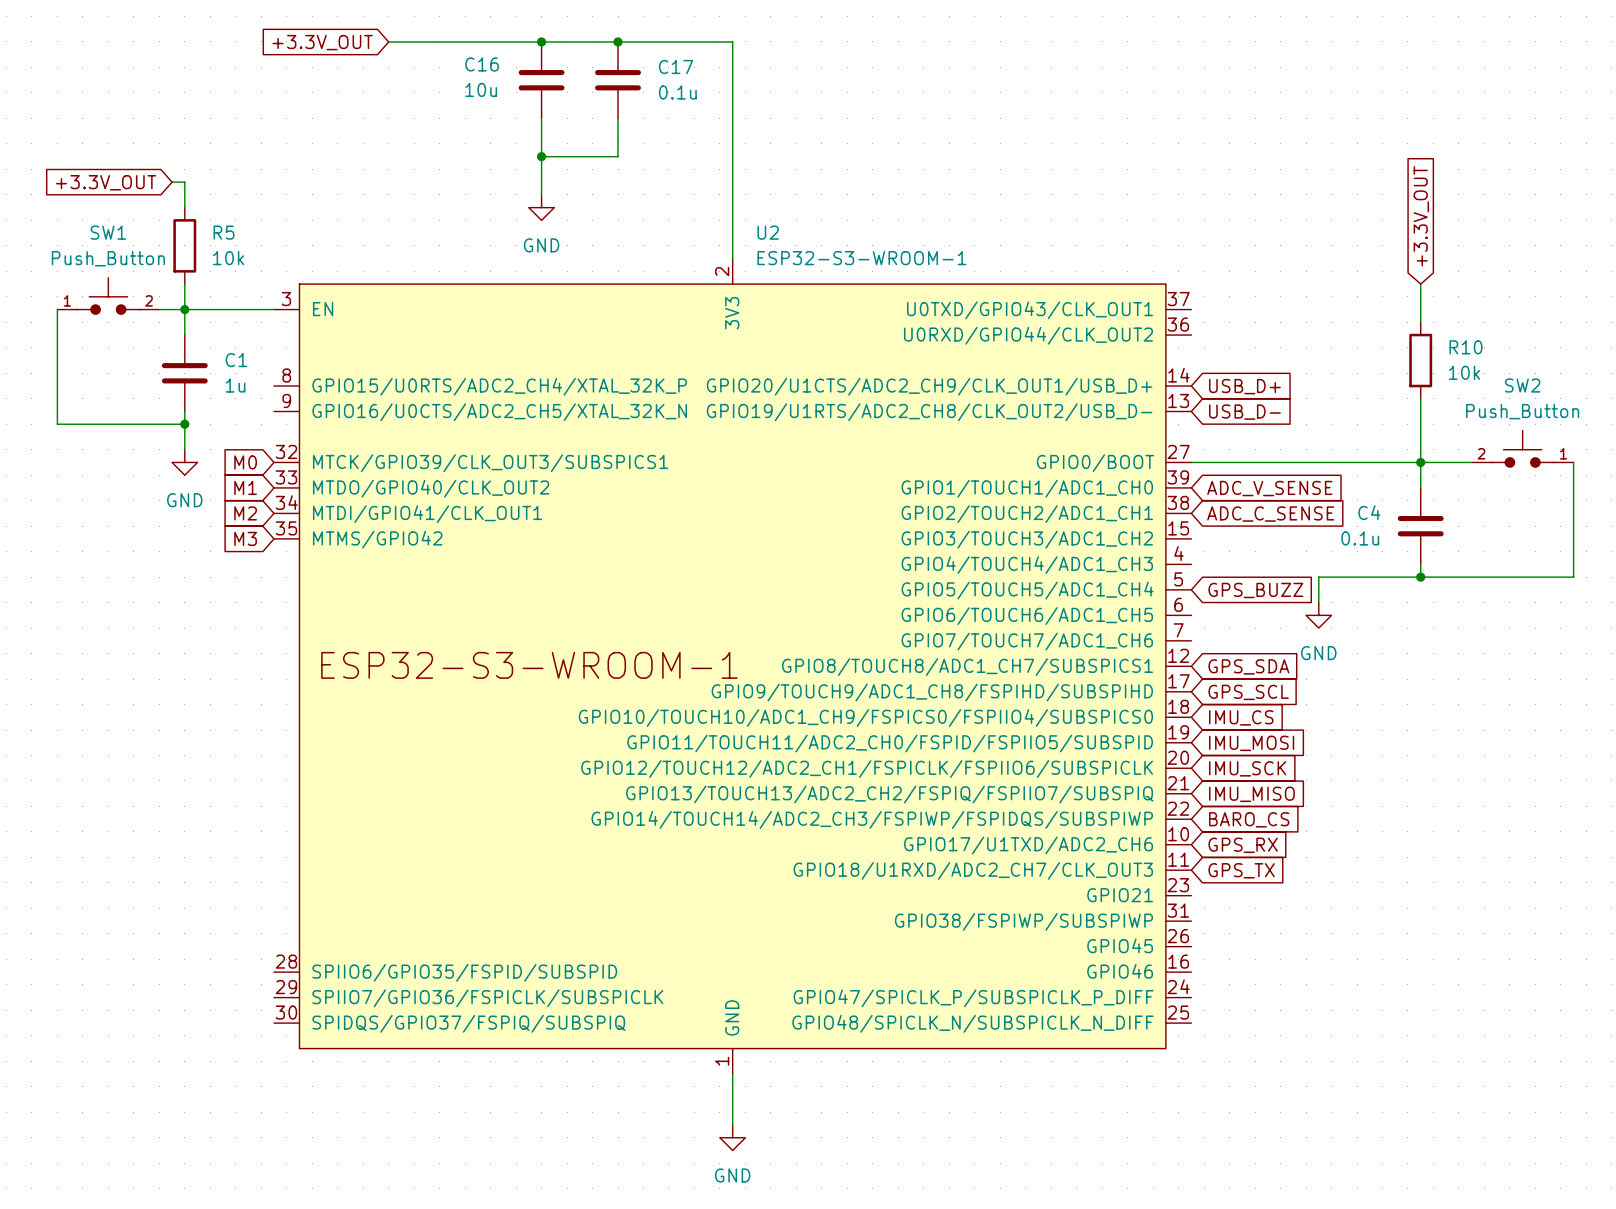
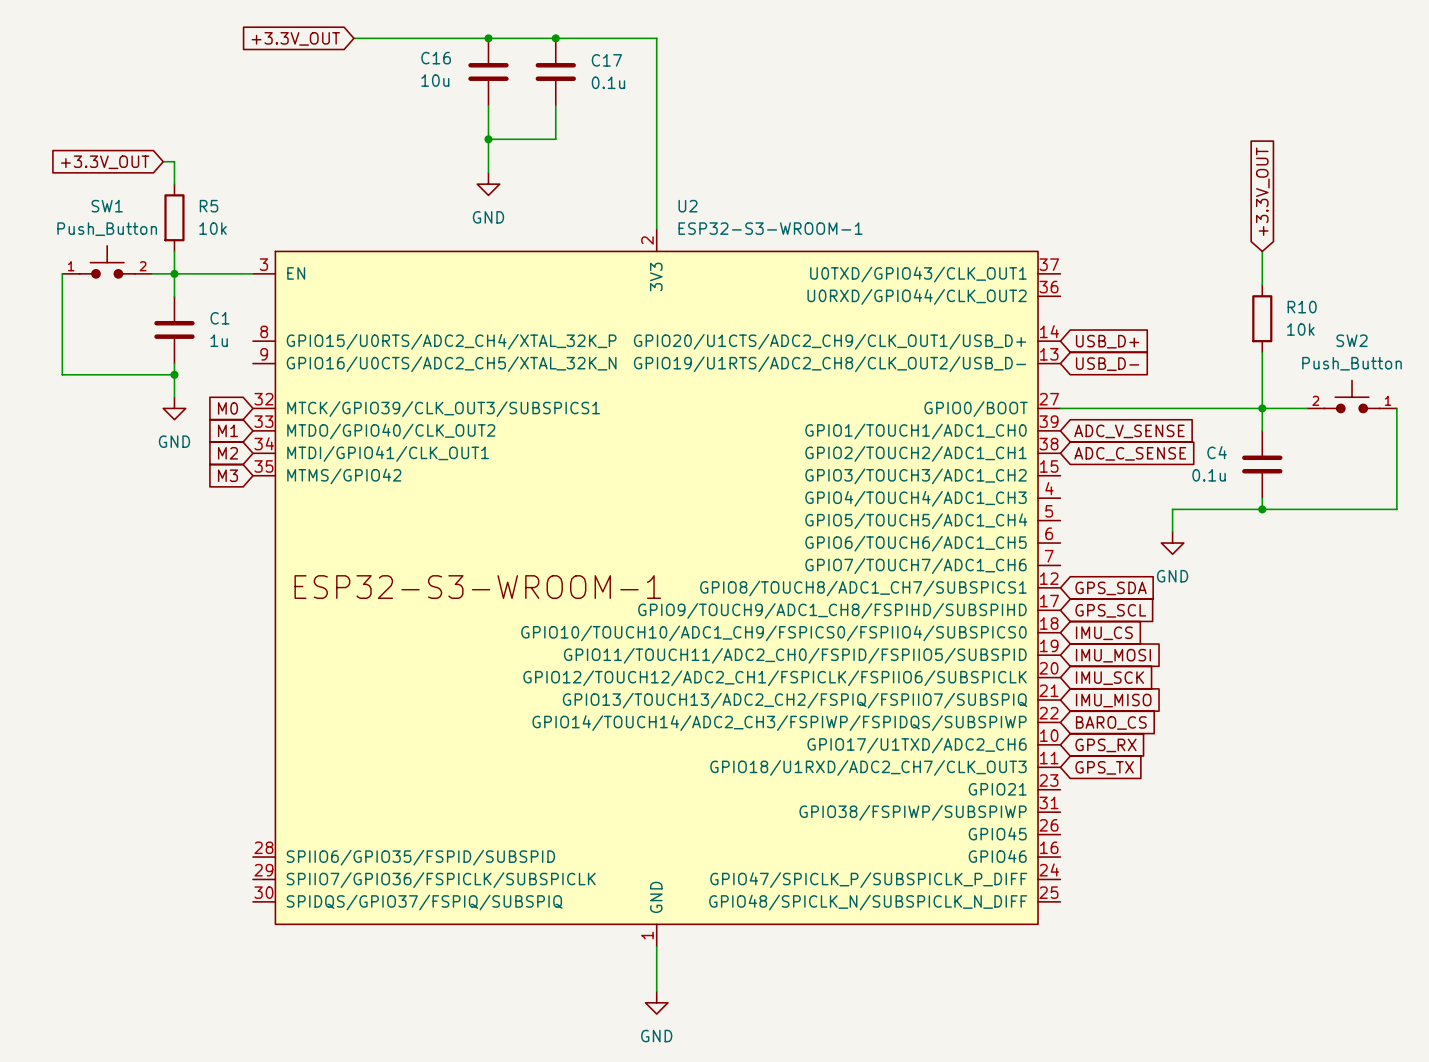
global label: GPS_BUZZ (1255, 590) -> none

